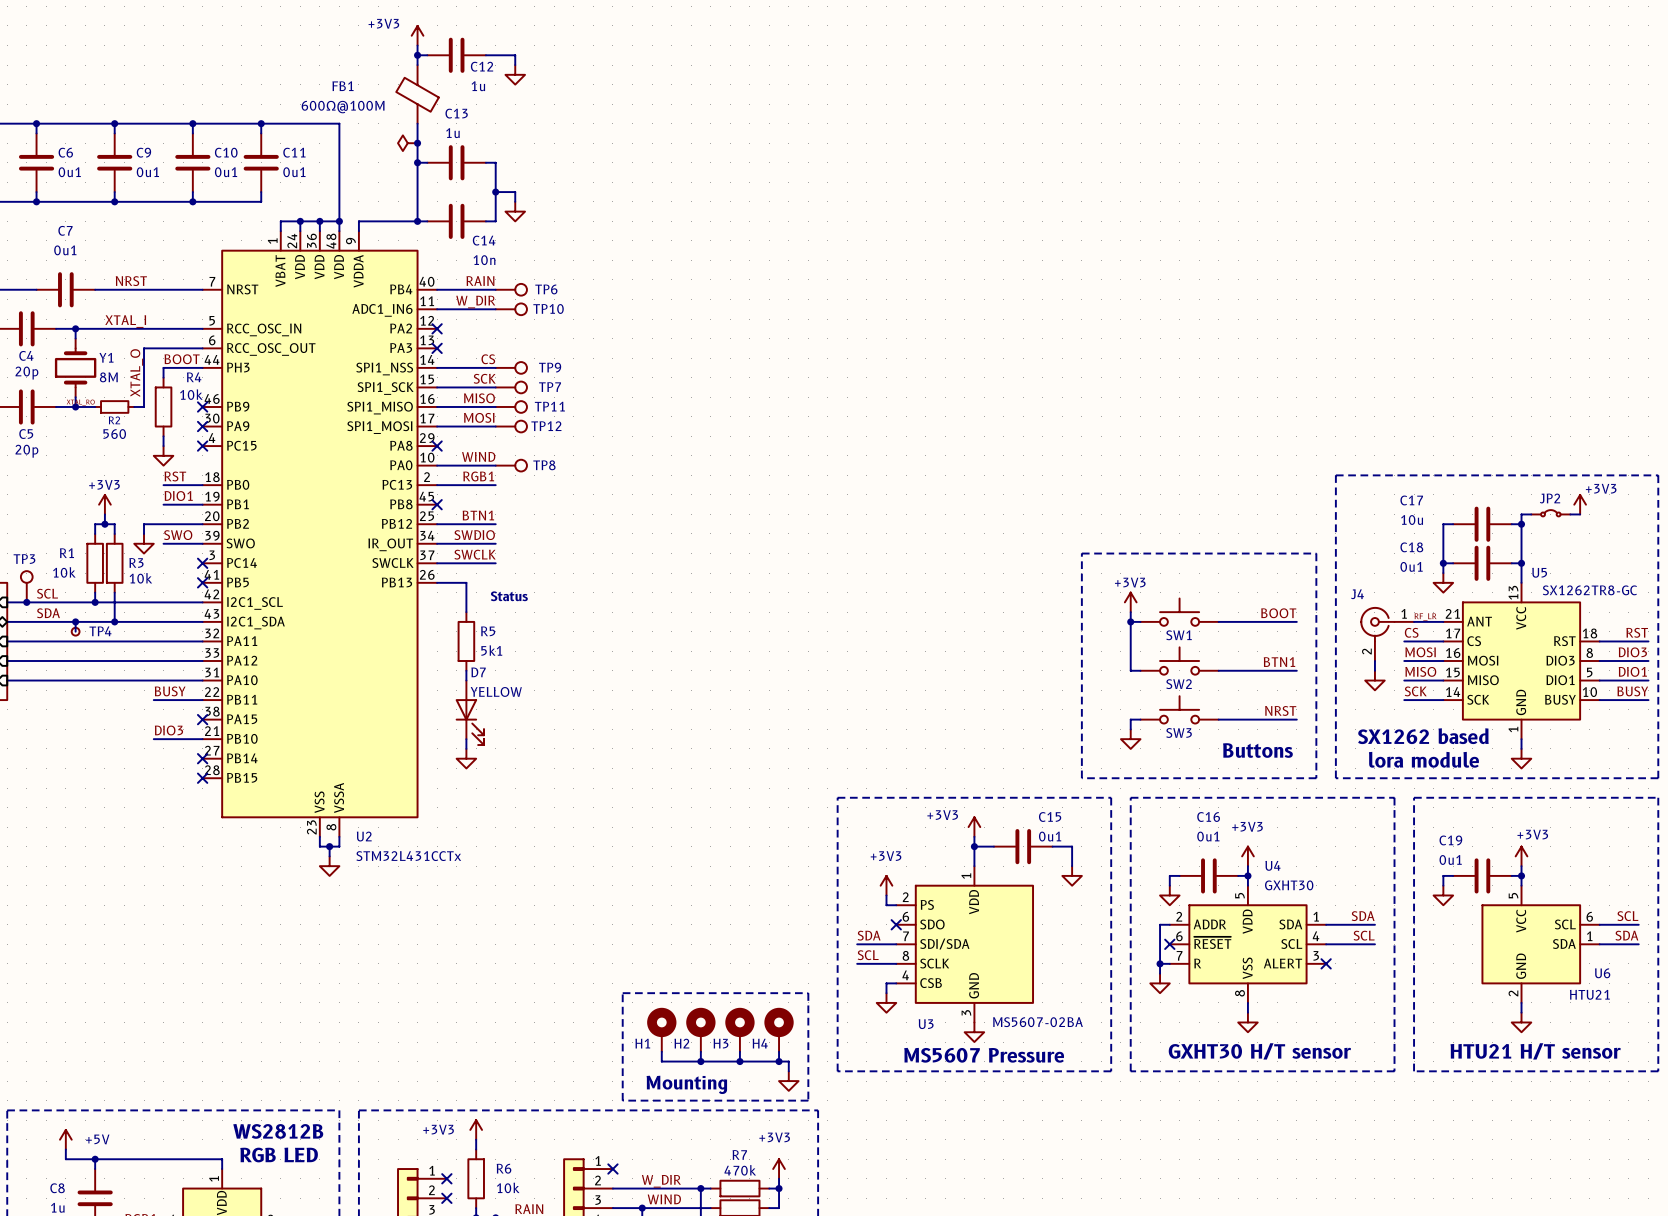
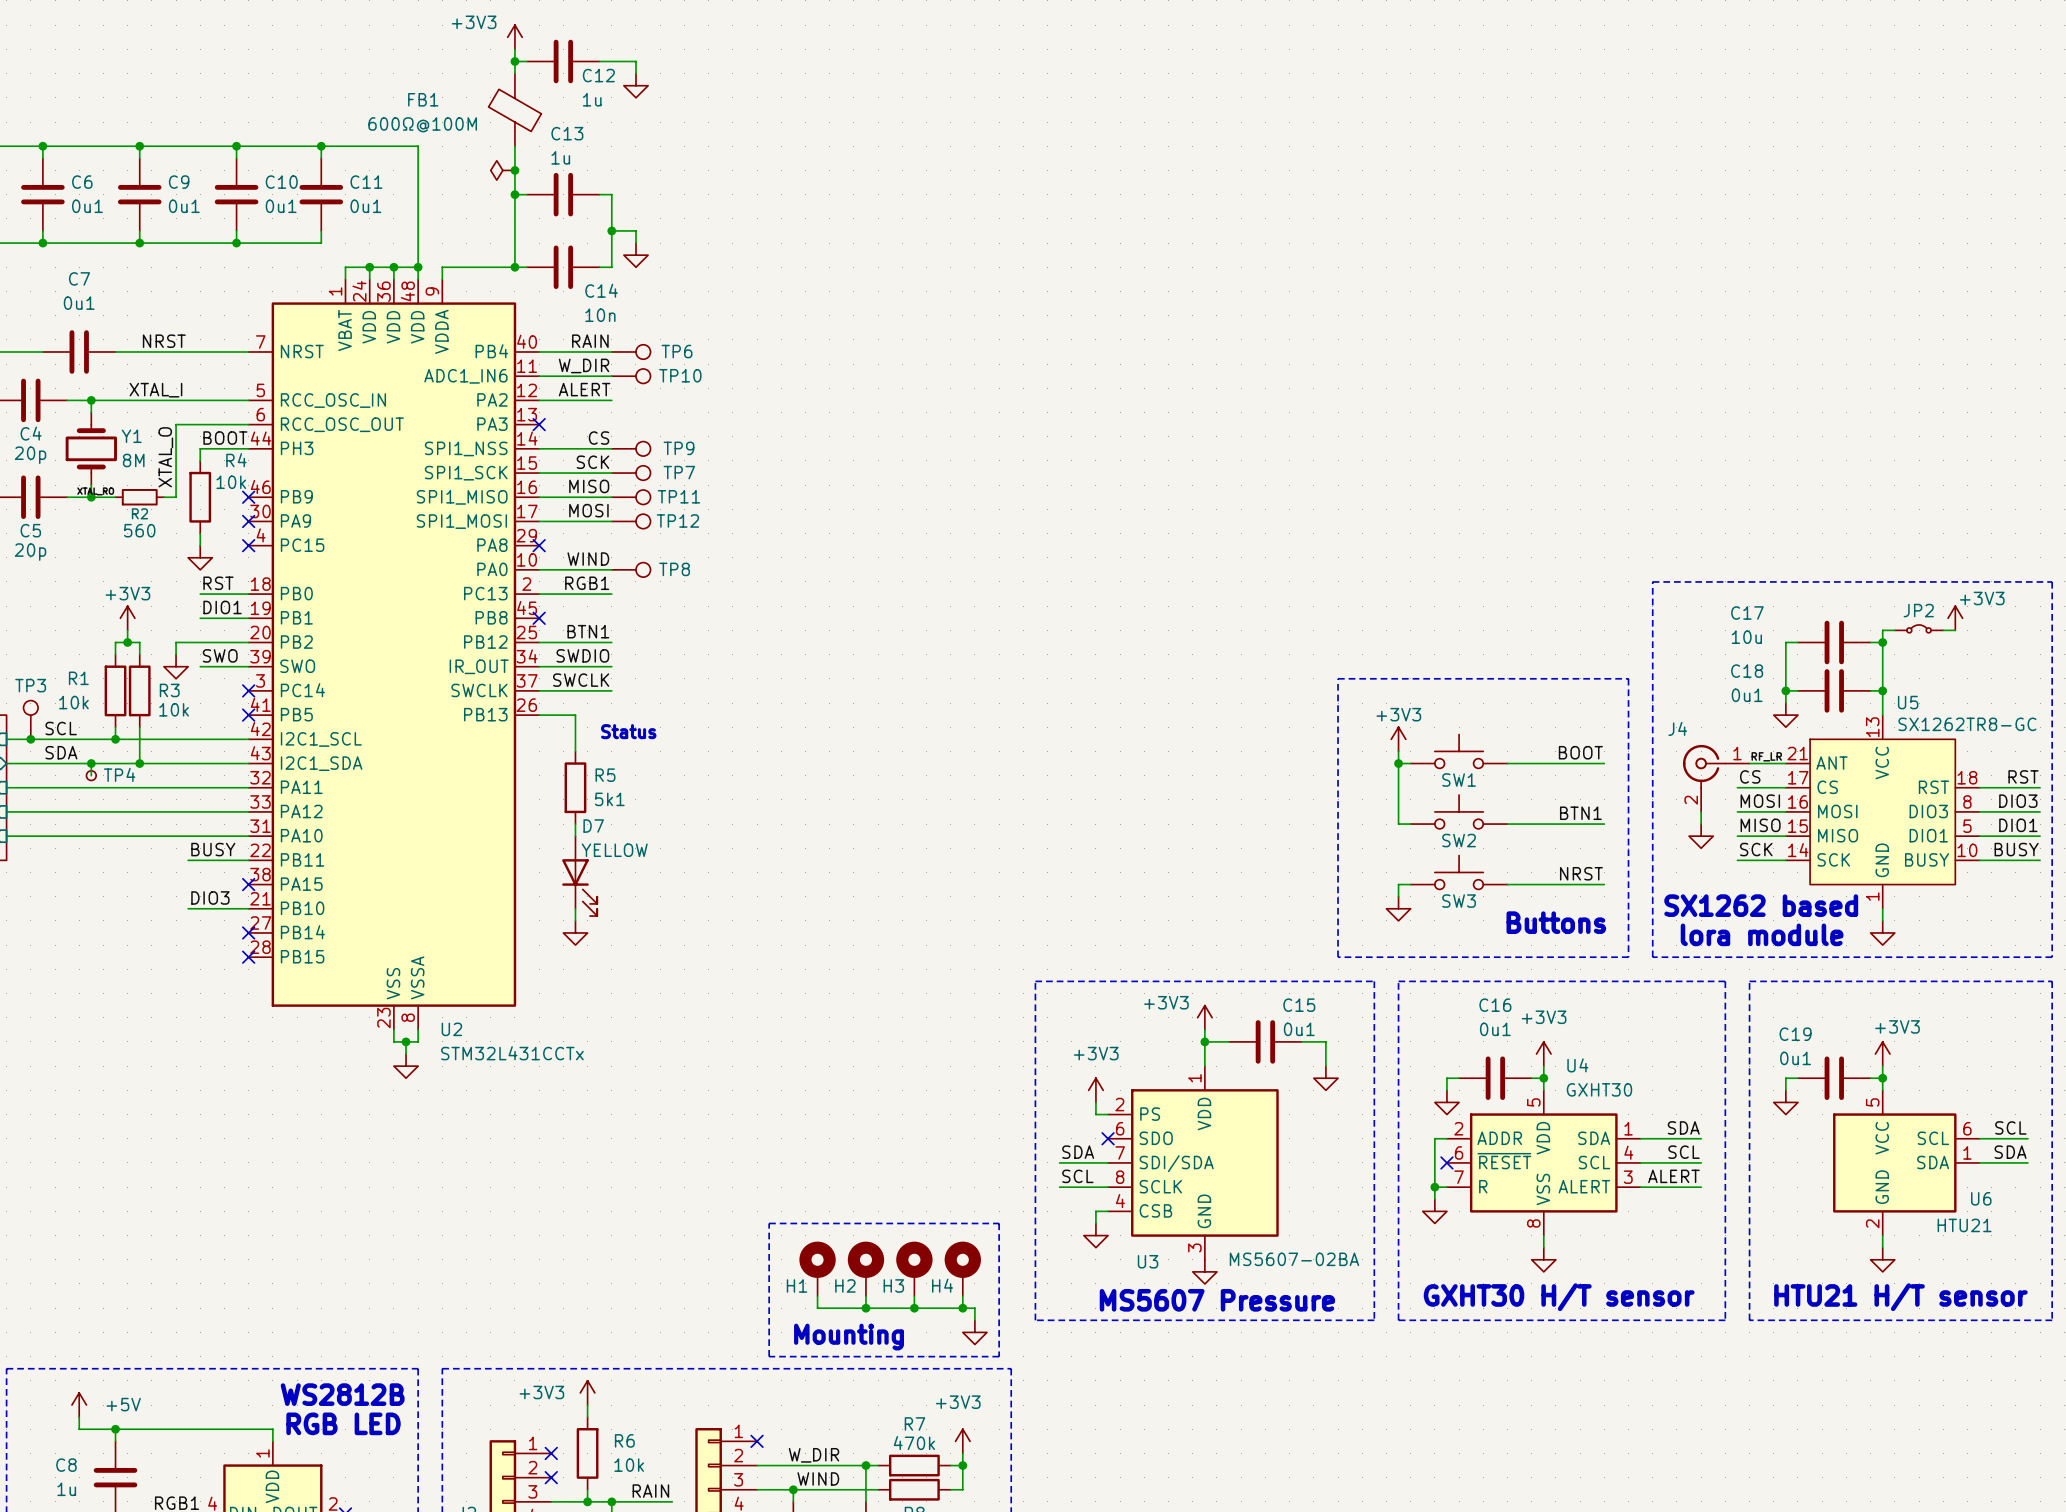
label: none -> ALERT (584, 389)
wire: none -> (539, 400) (611, 400)
no-connect mark: (437, 328) -> none
label: none -> ALERT (1673, 1176)
wire: none -> (1640, 1187) (1701, 1187)
no-connect mark: (1326, 963) -> none

